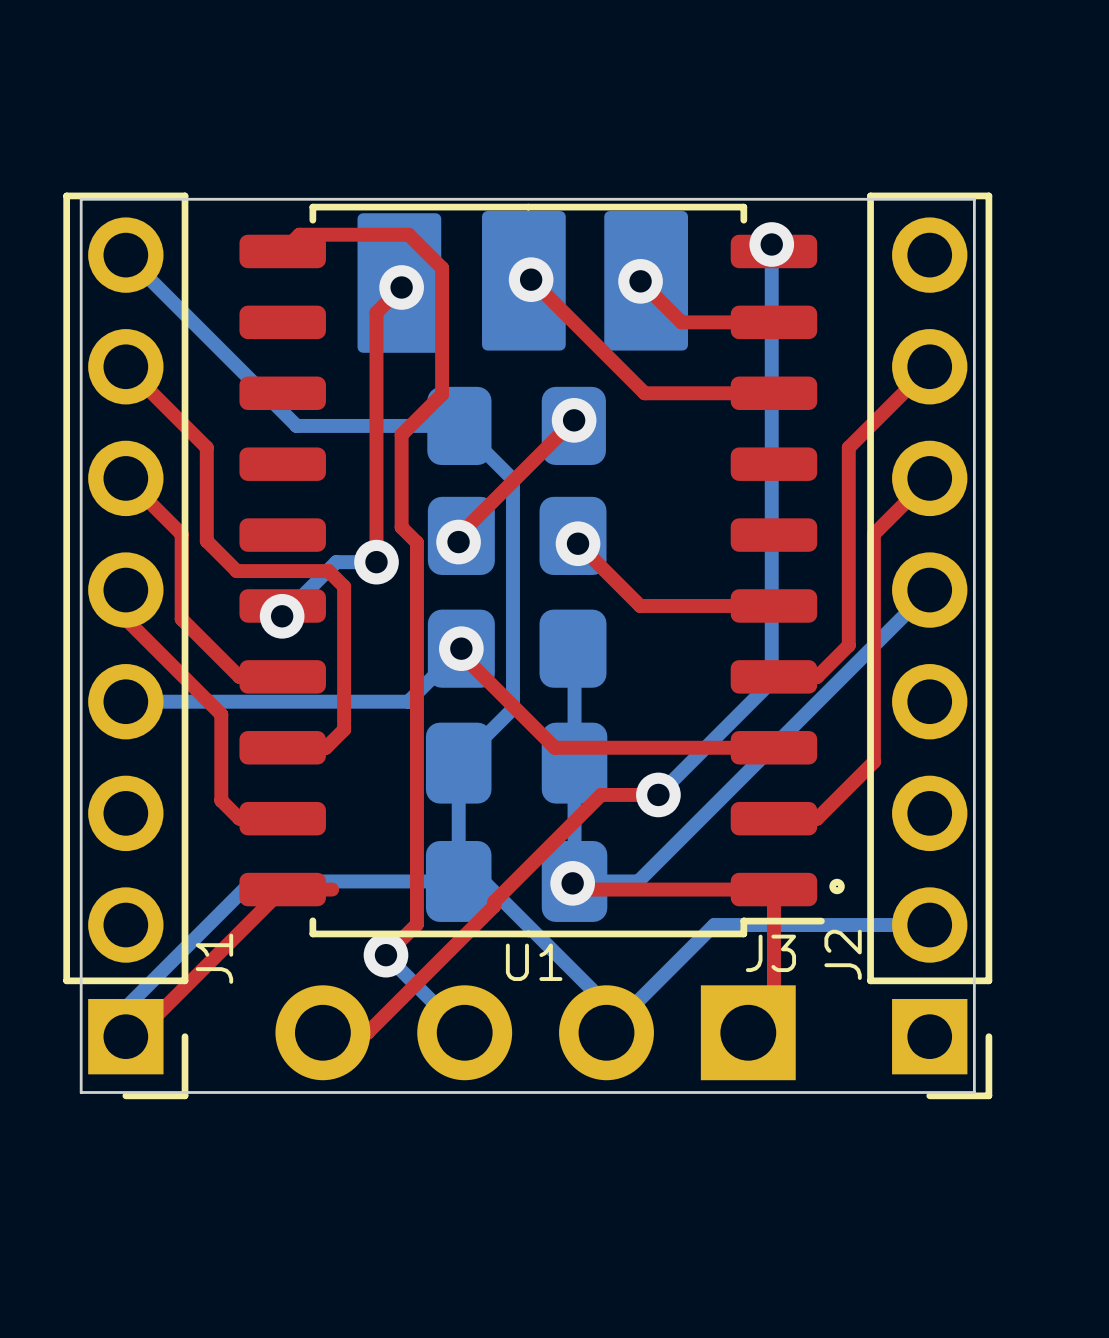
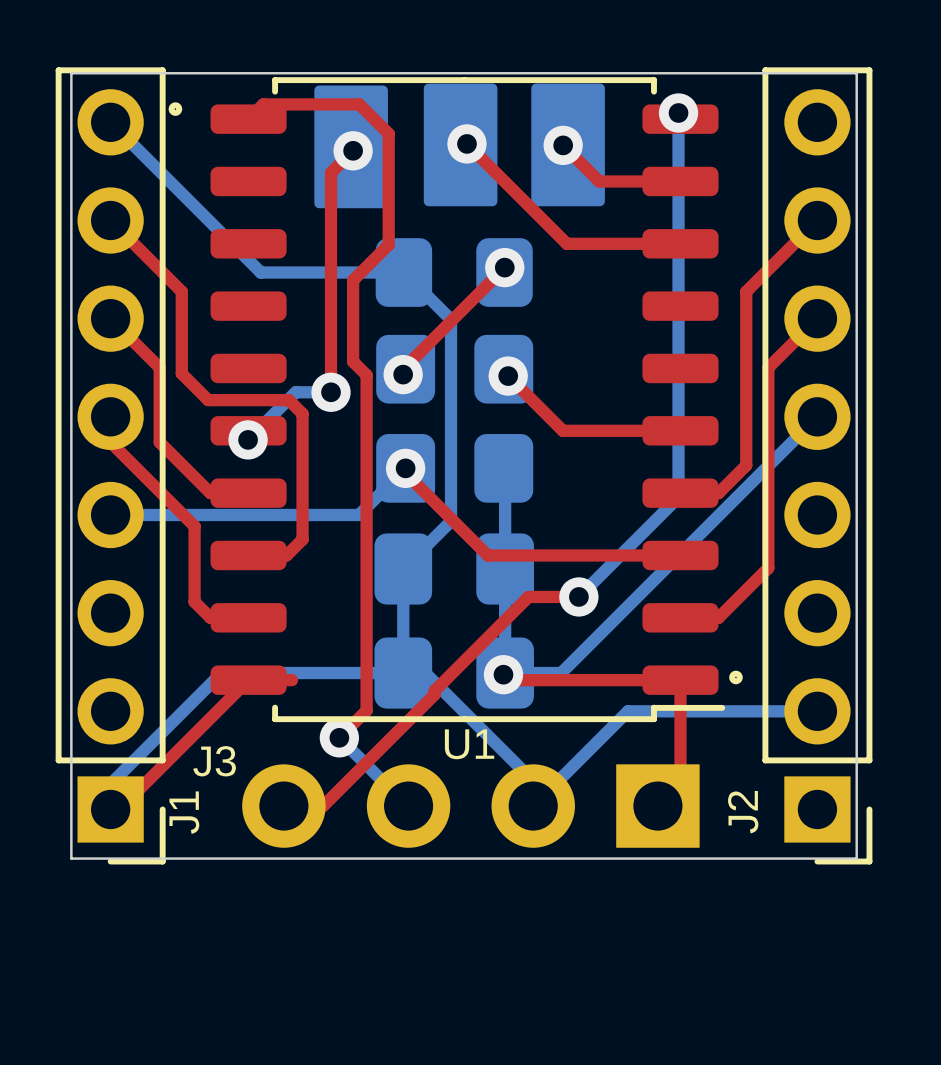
drawing: none -> [168, 102, 183, 116]
J3 name position: J3 (770, 953) -> J3 (214, 761)
text position: J2 (843, 954) -> J2 (743, 812)
text position: J1 (214, 958) -> J1 (184, 812)

